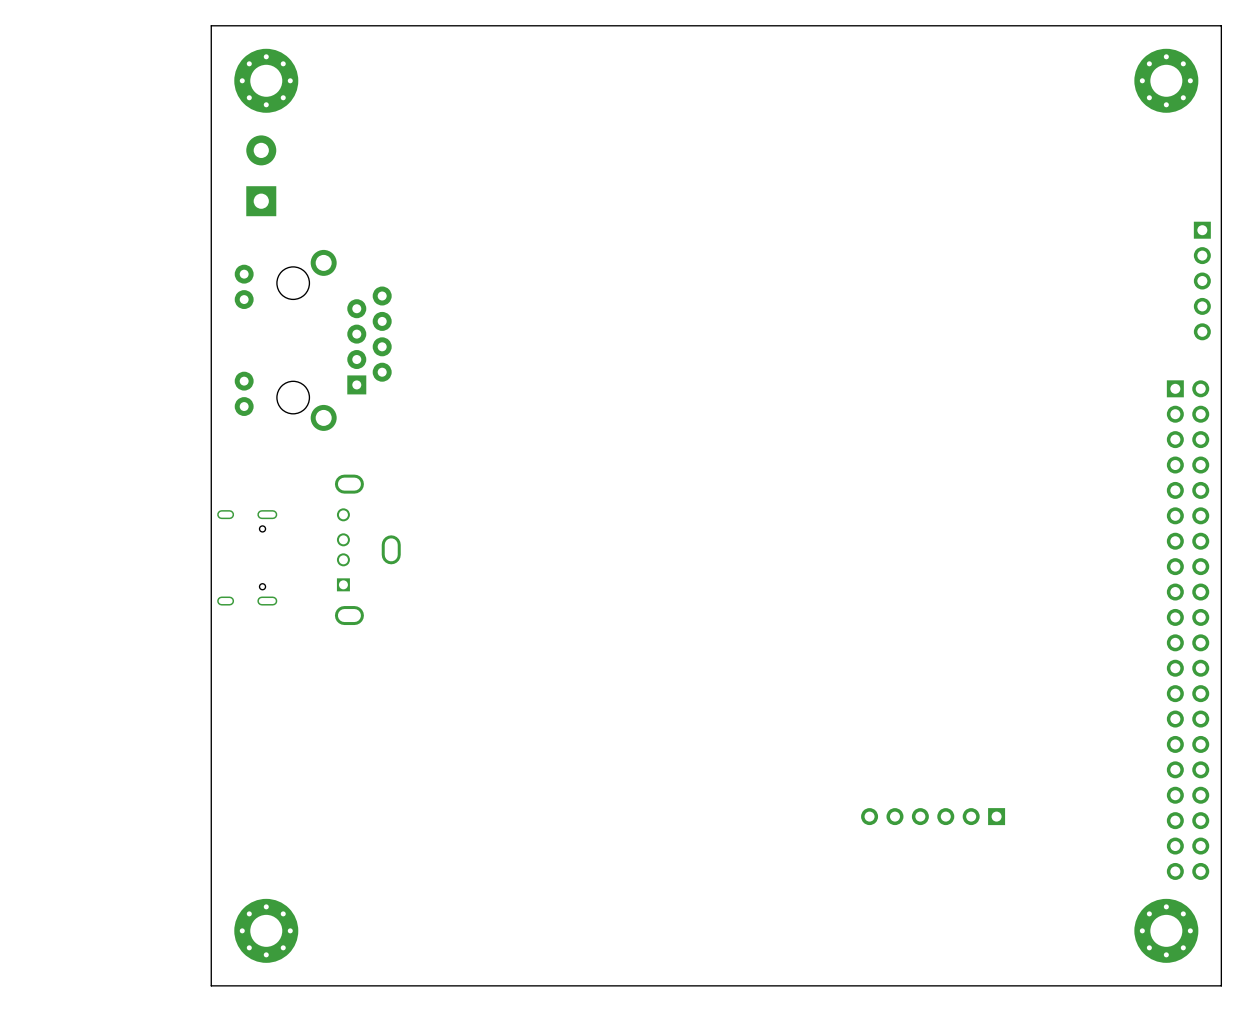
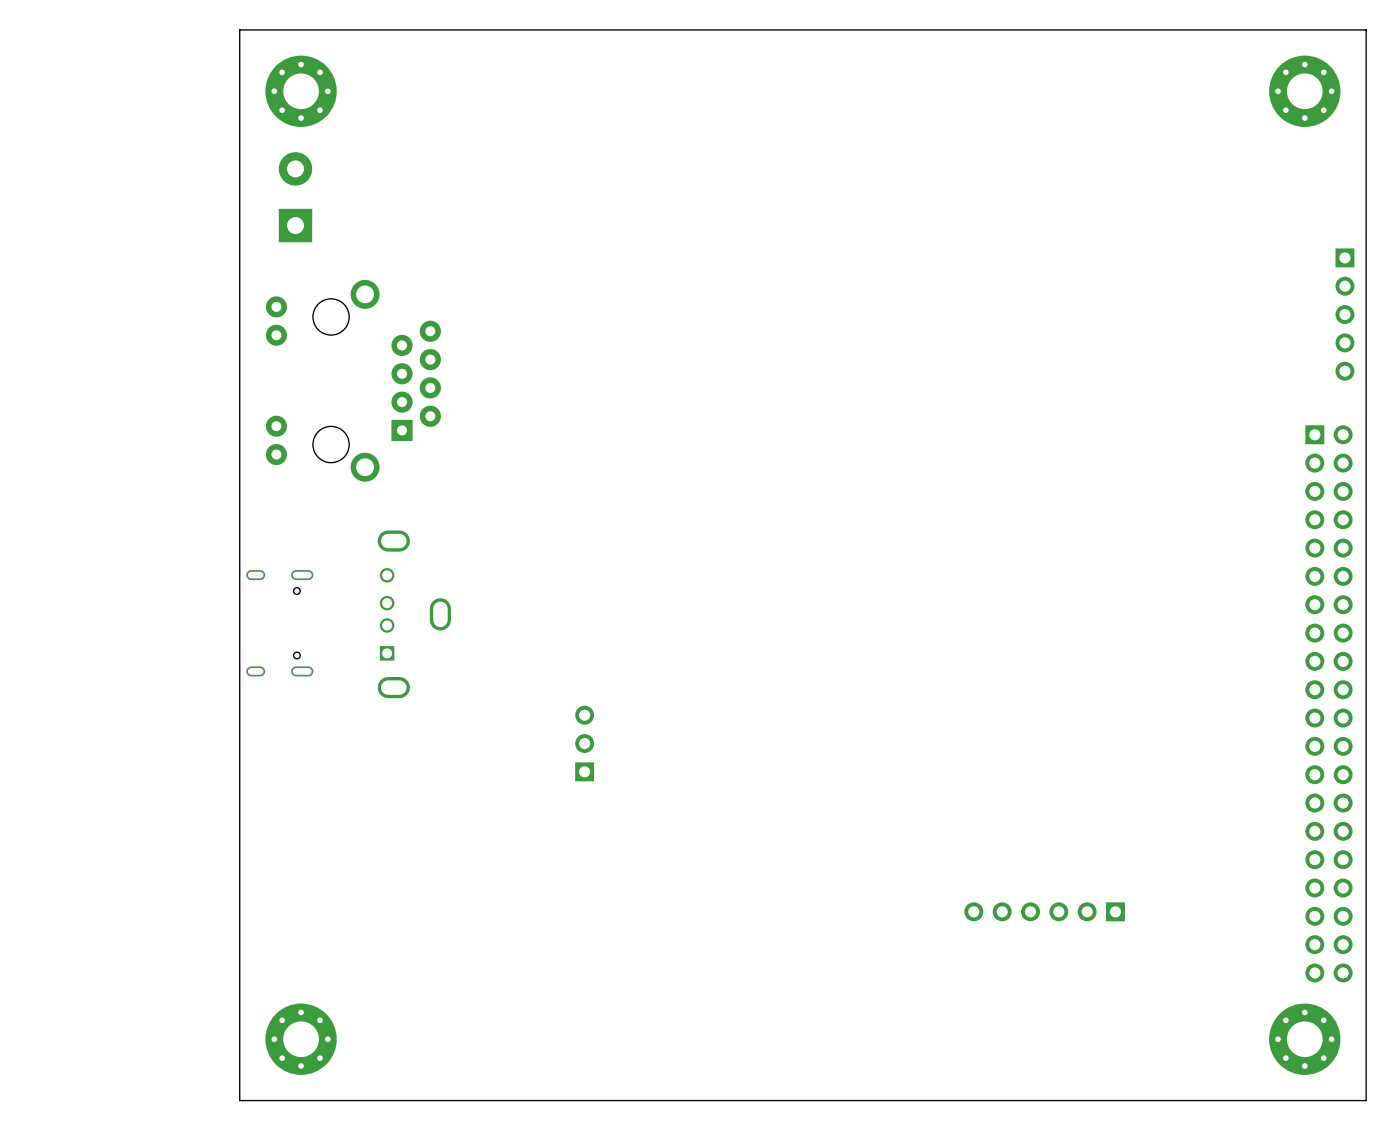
part: none -> (584, 743)

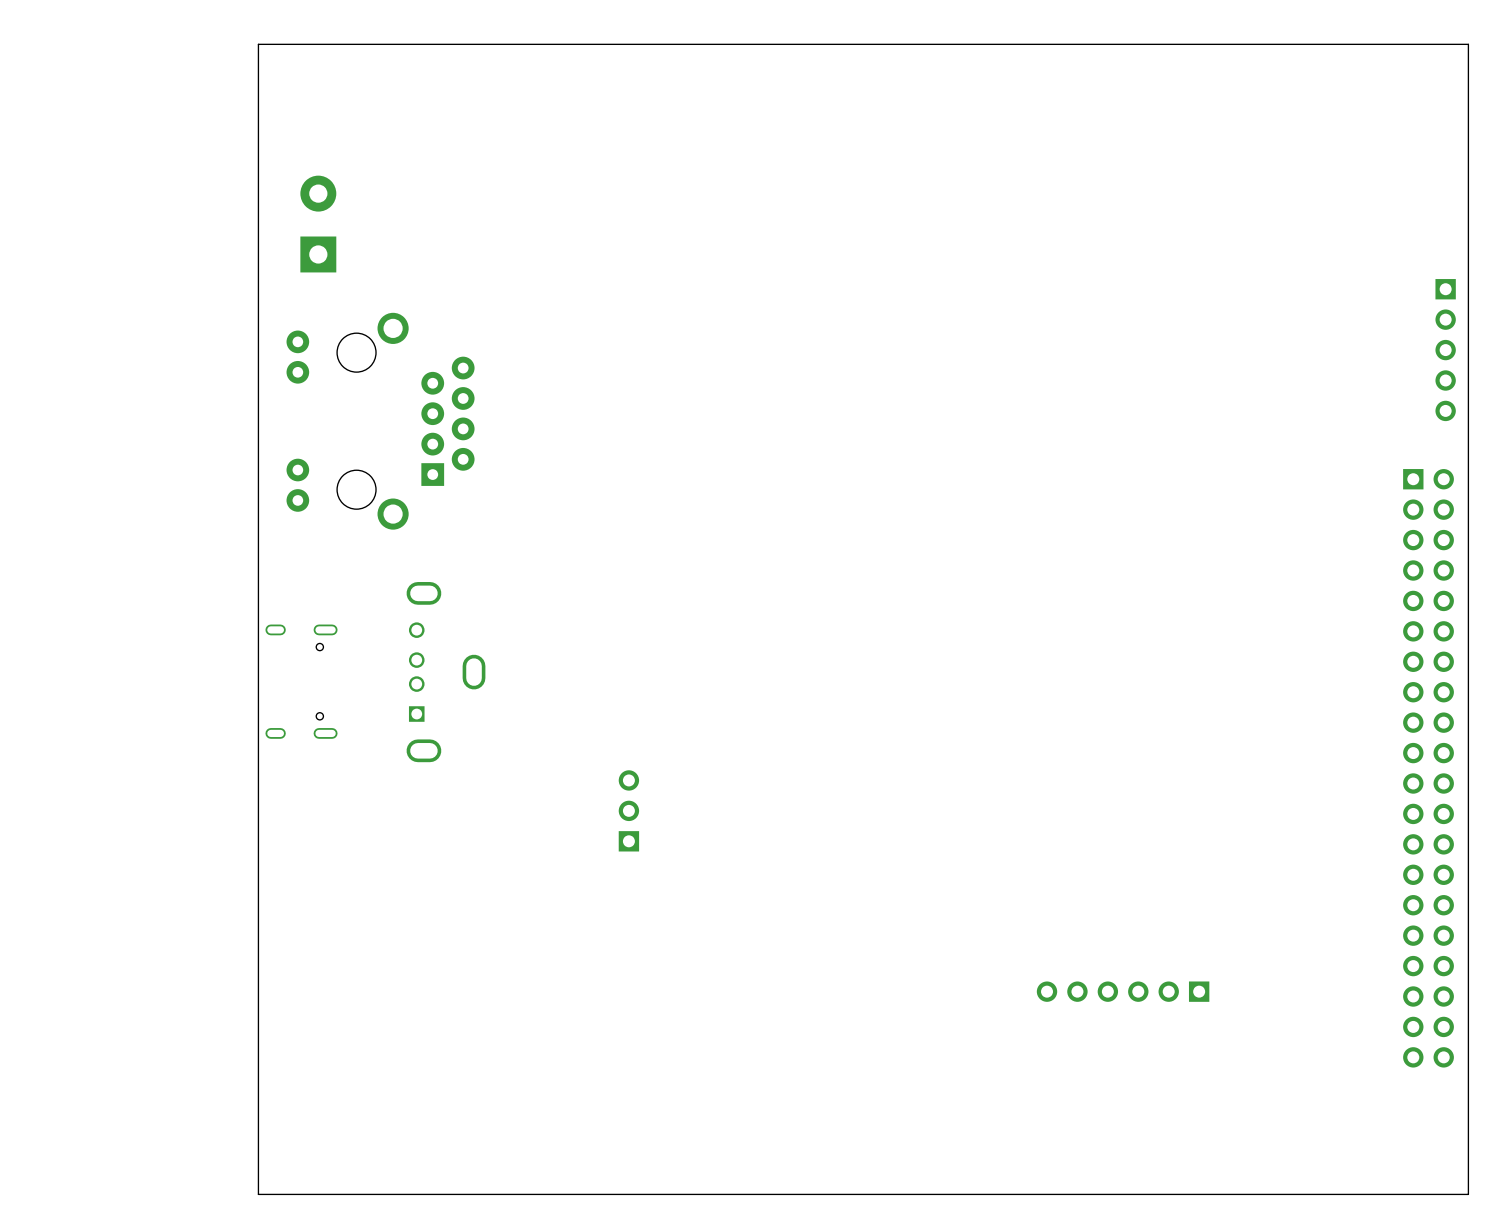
part: (301, 91) -> none
part: (1304, 91) -> none
part: (301, 1039) -> none
part: (1304, 1039) -> none

